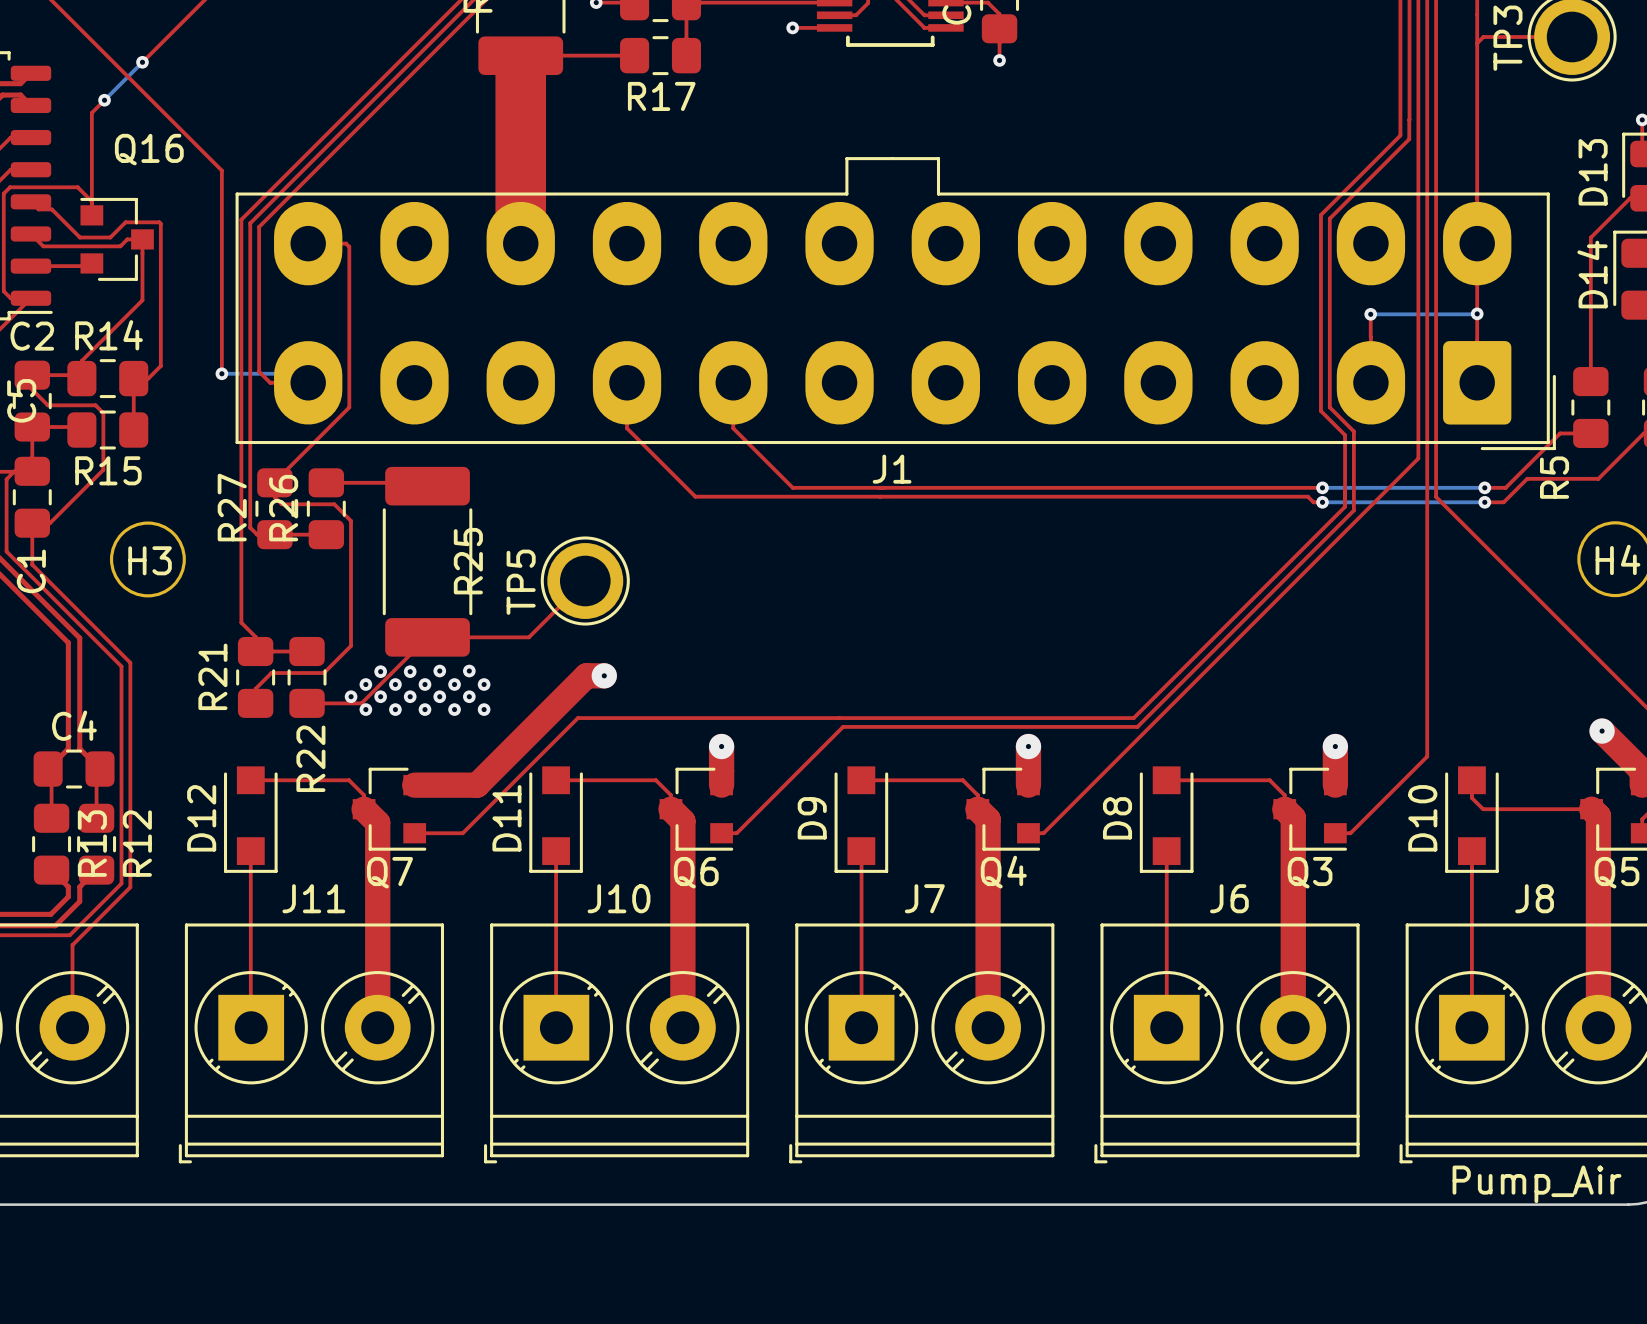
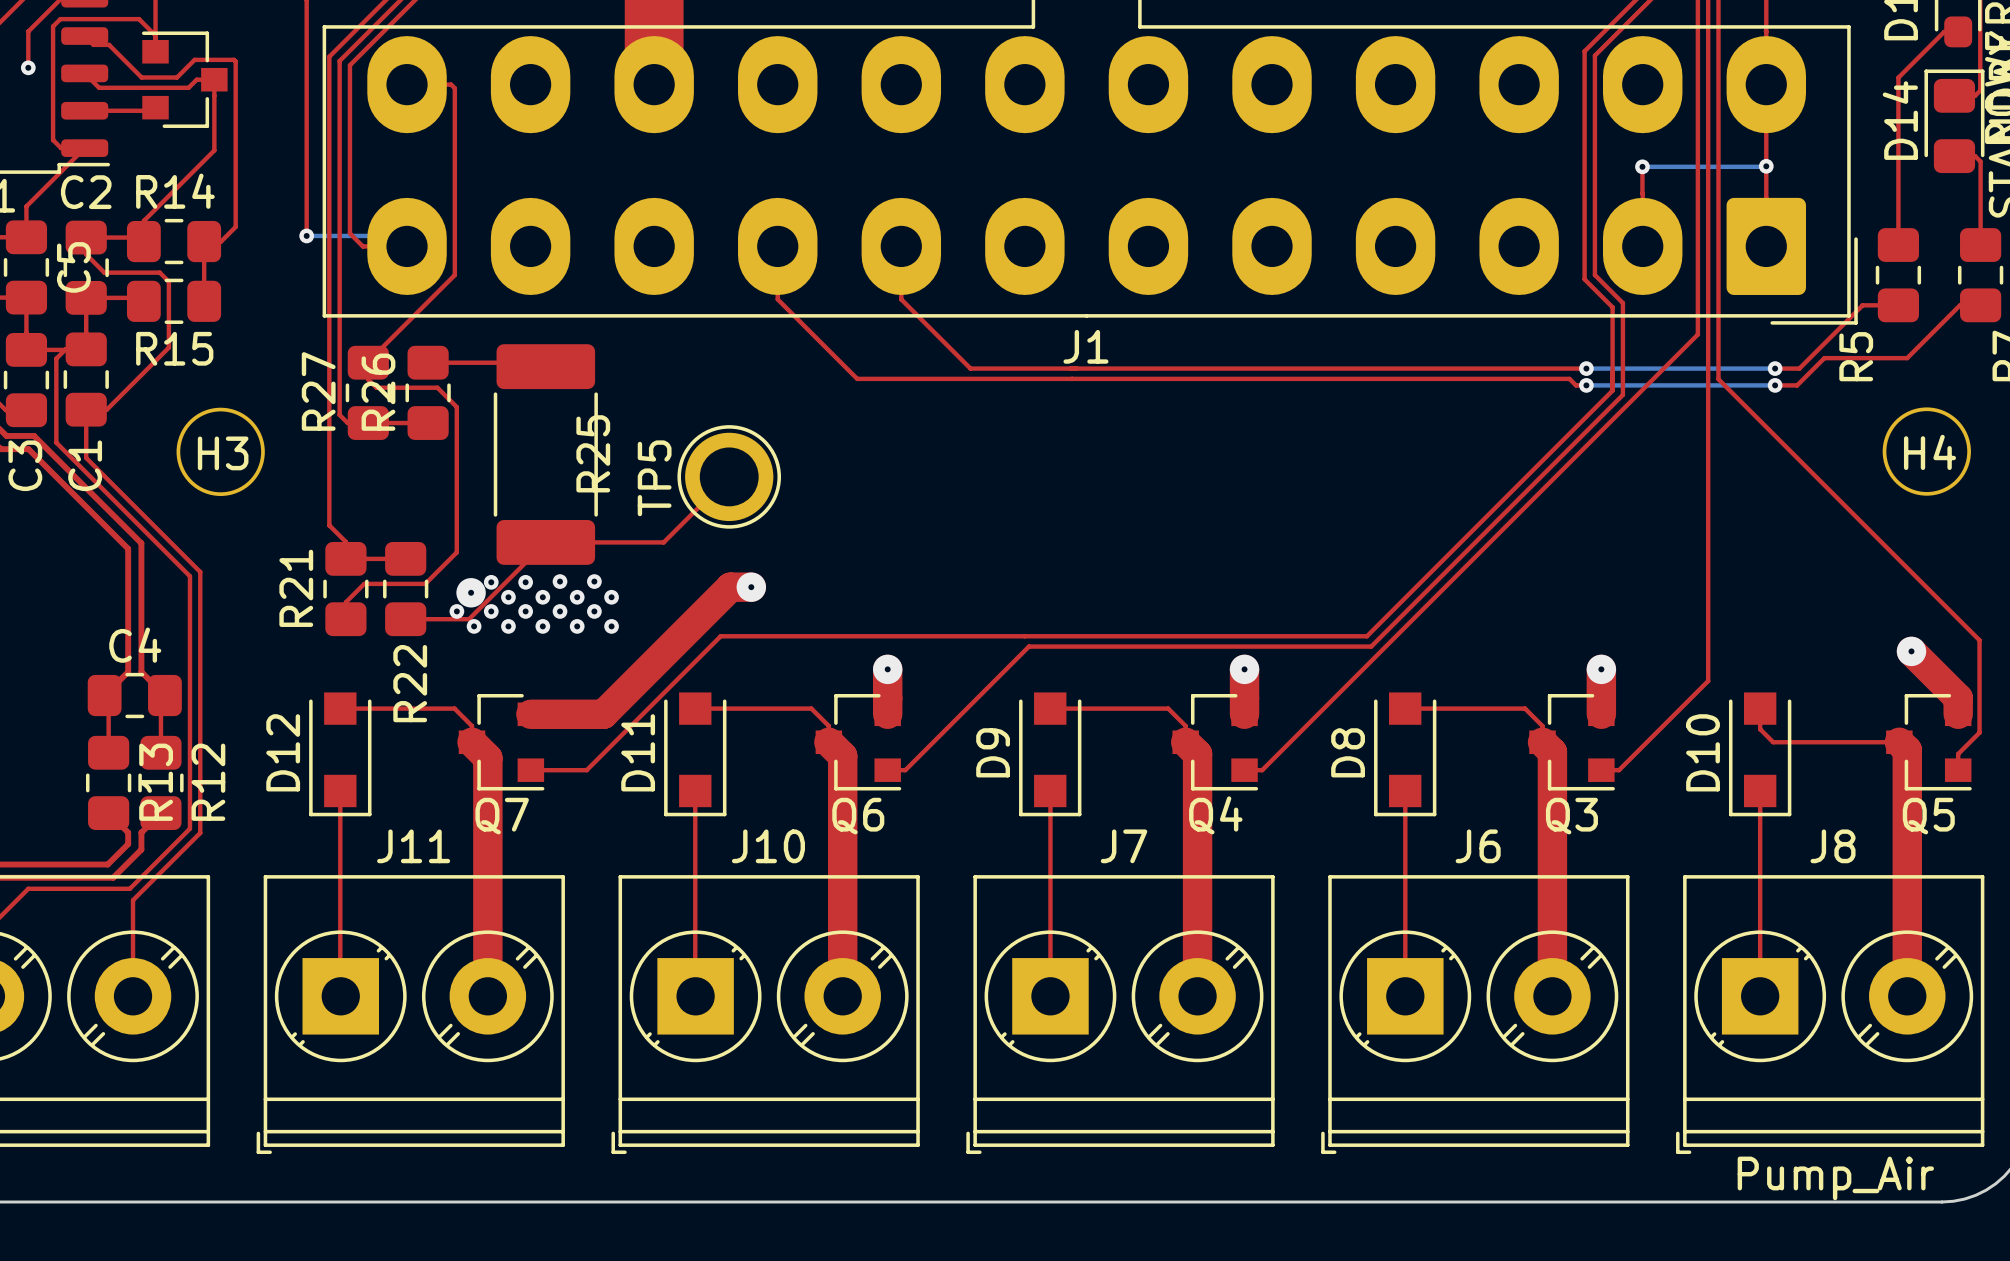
via size: [359, 678, 373, 691] -> [456, 578, 486, 608]

